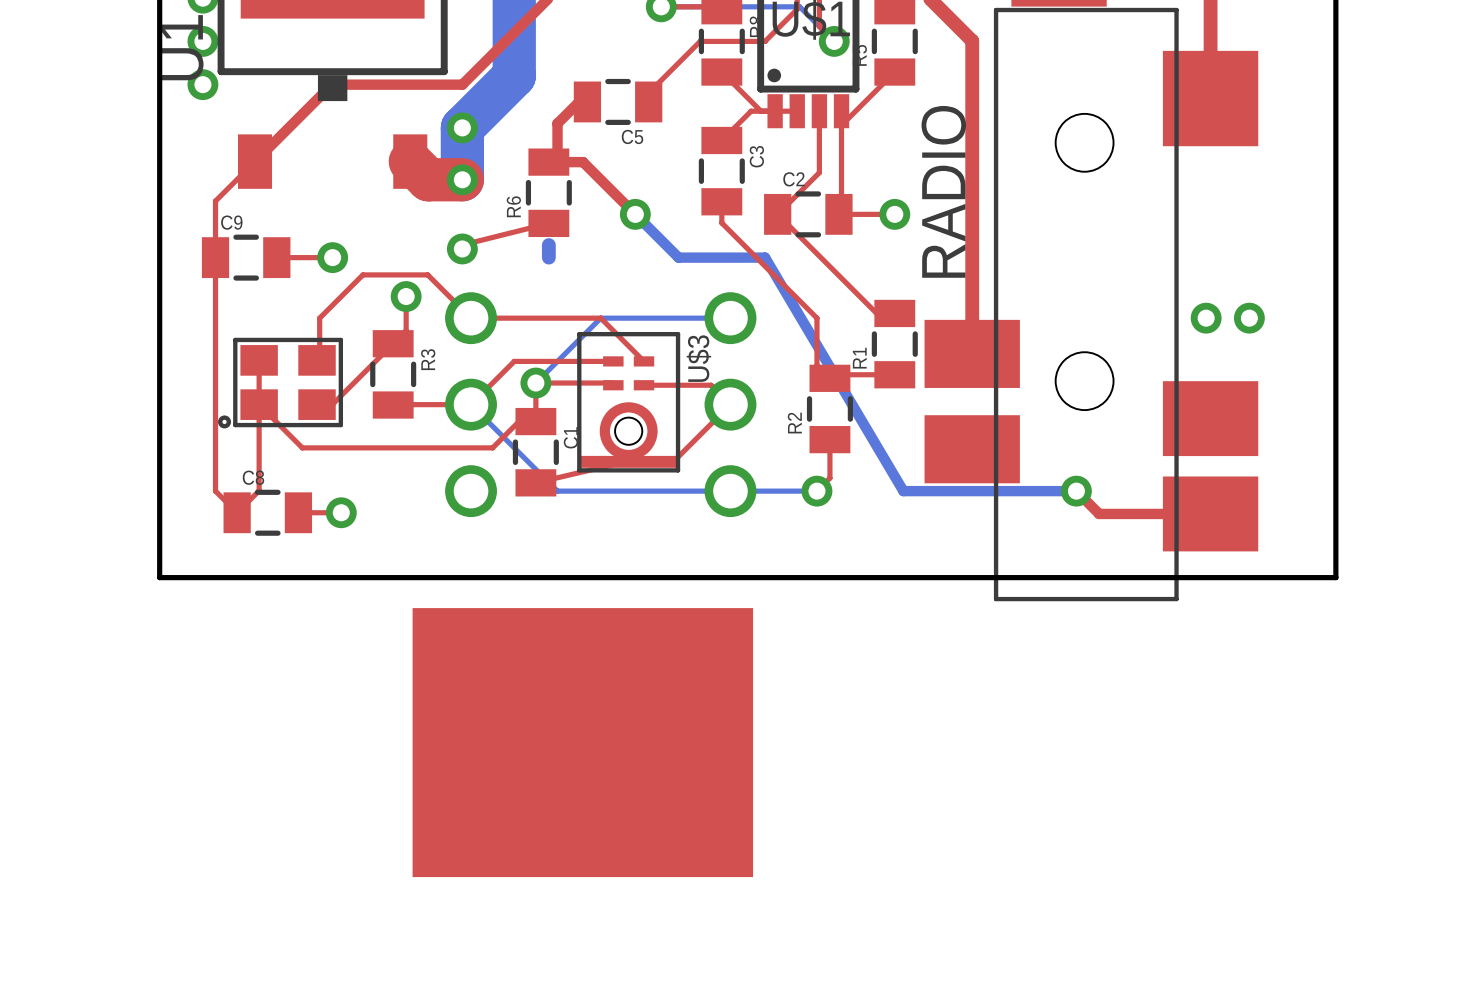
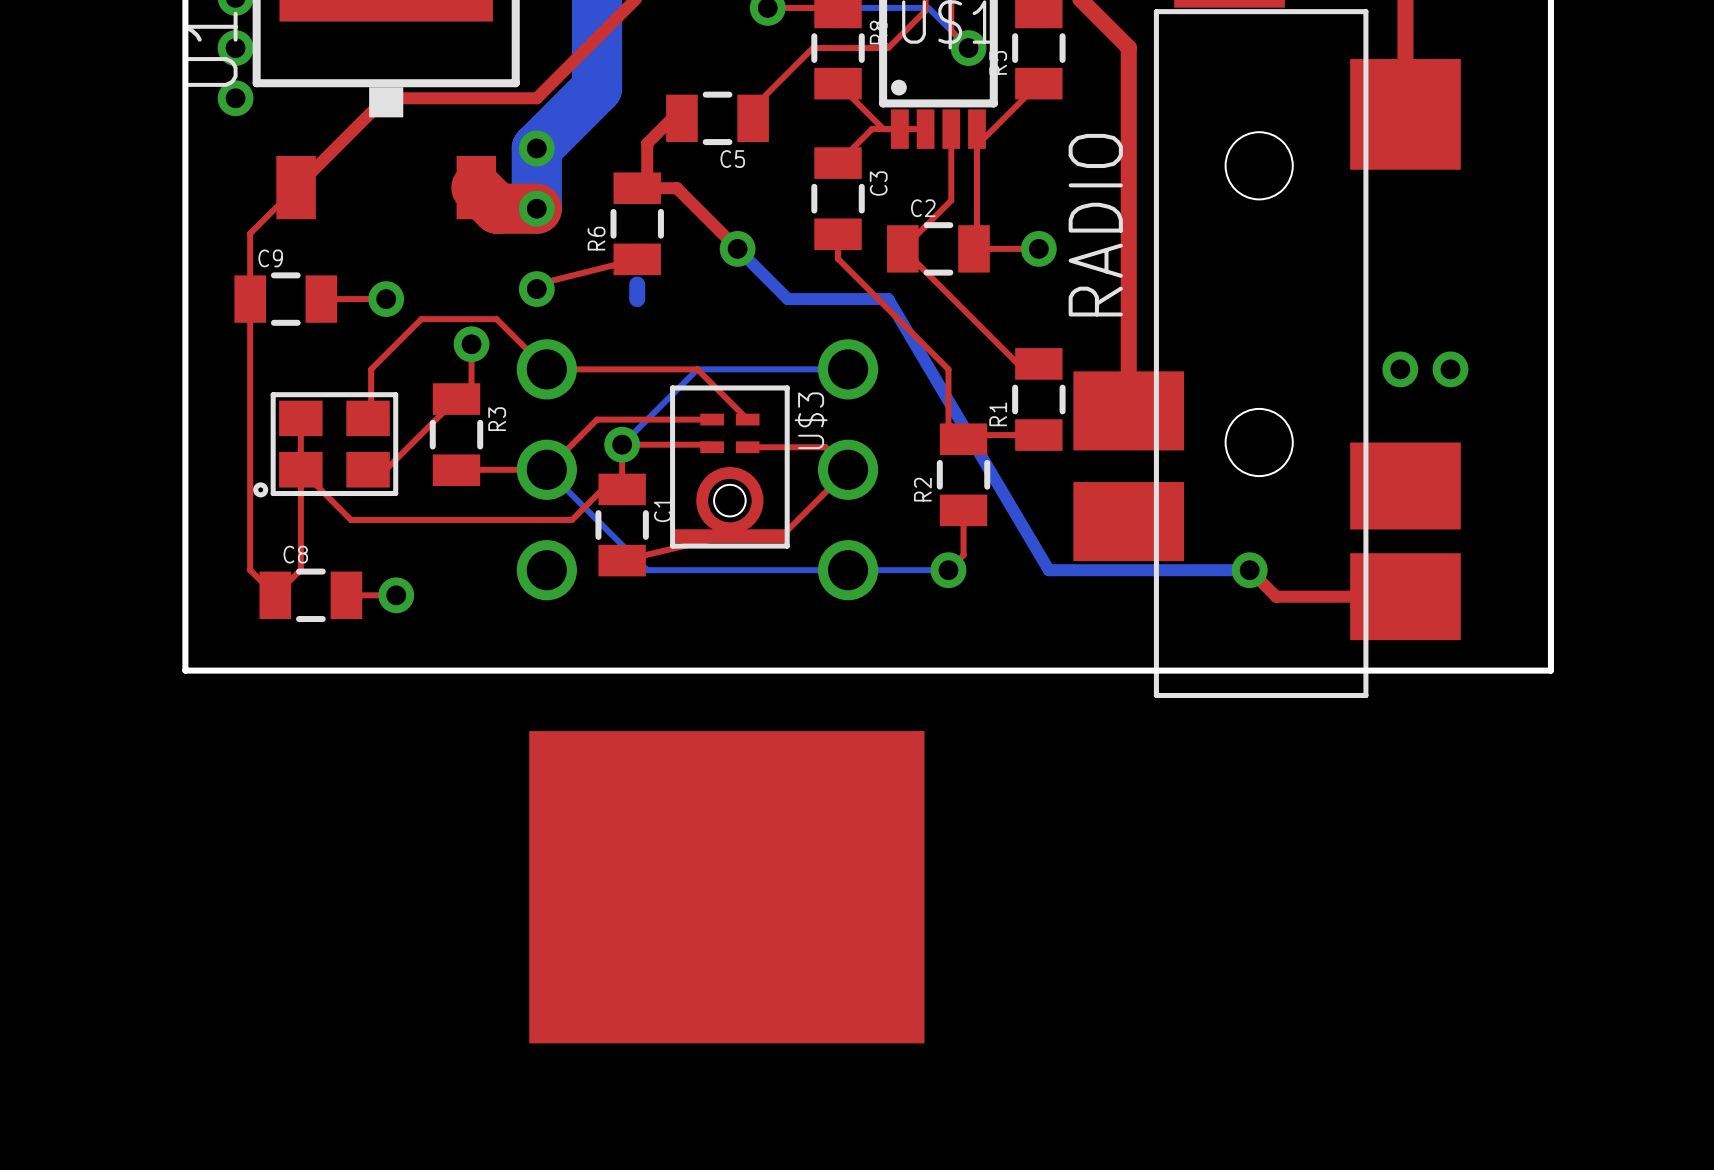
drawing position: (582, 742) -> (726, 887)

